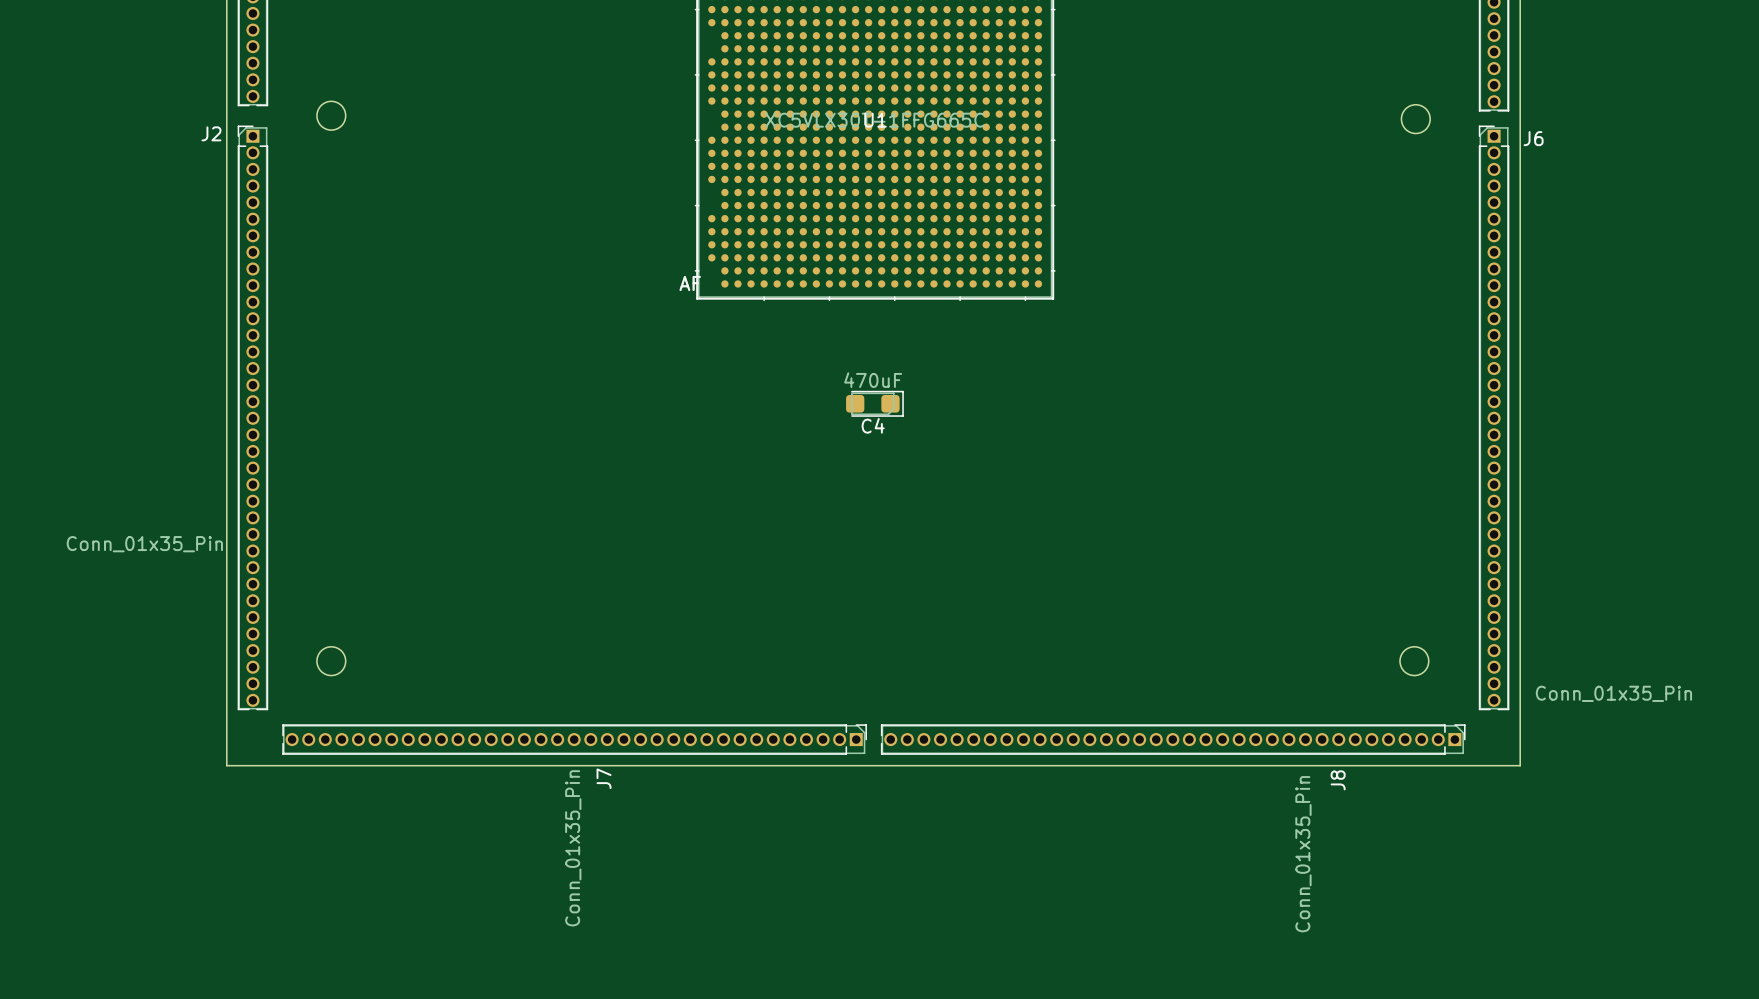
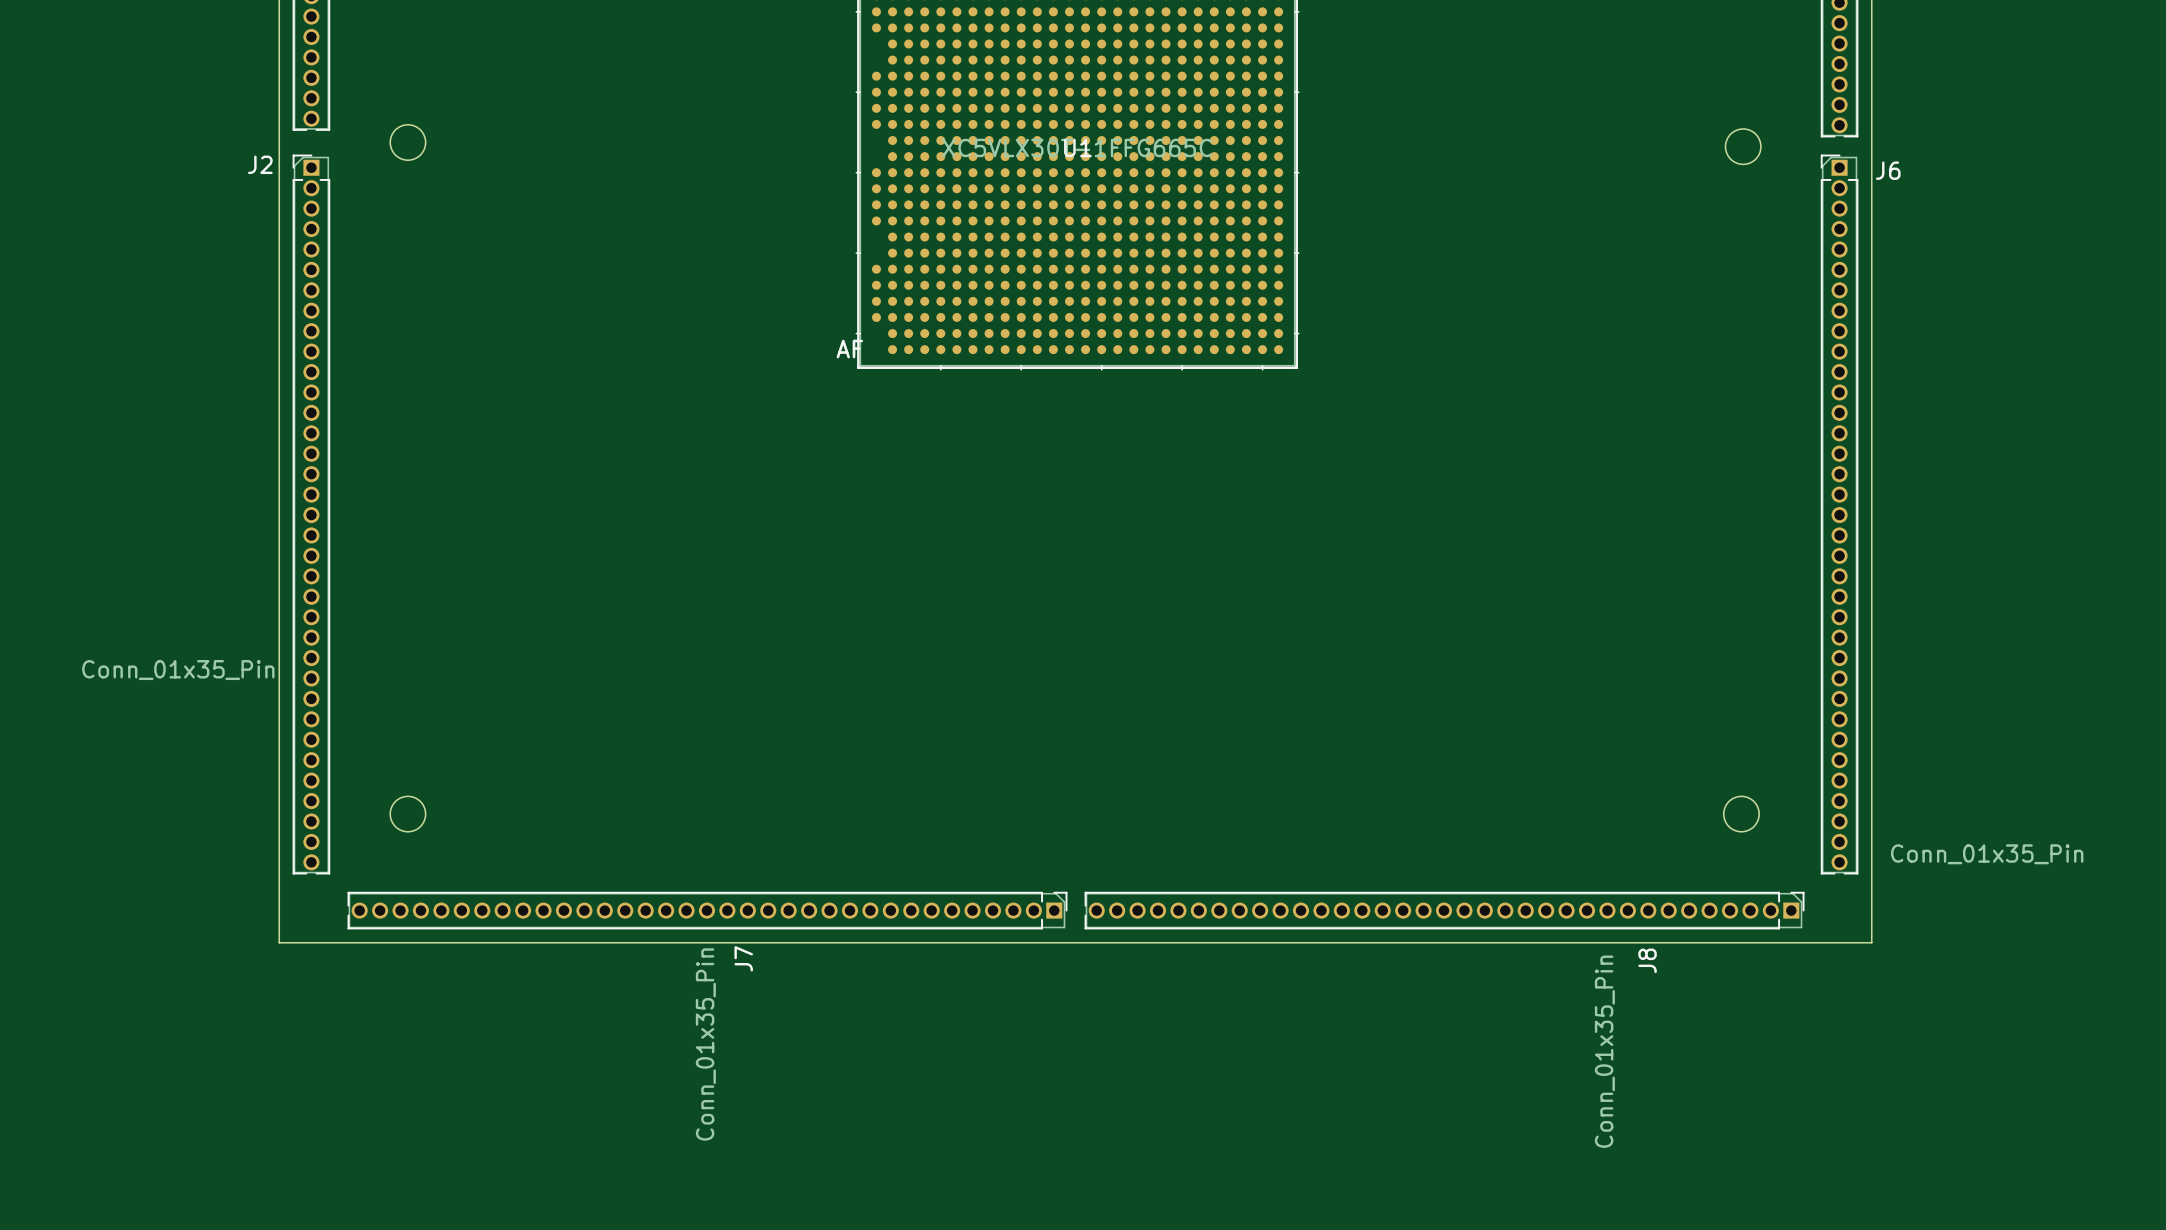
C4: 470uF (874, 403) -> none

